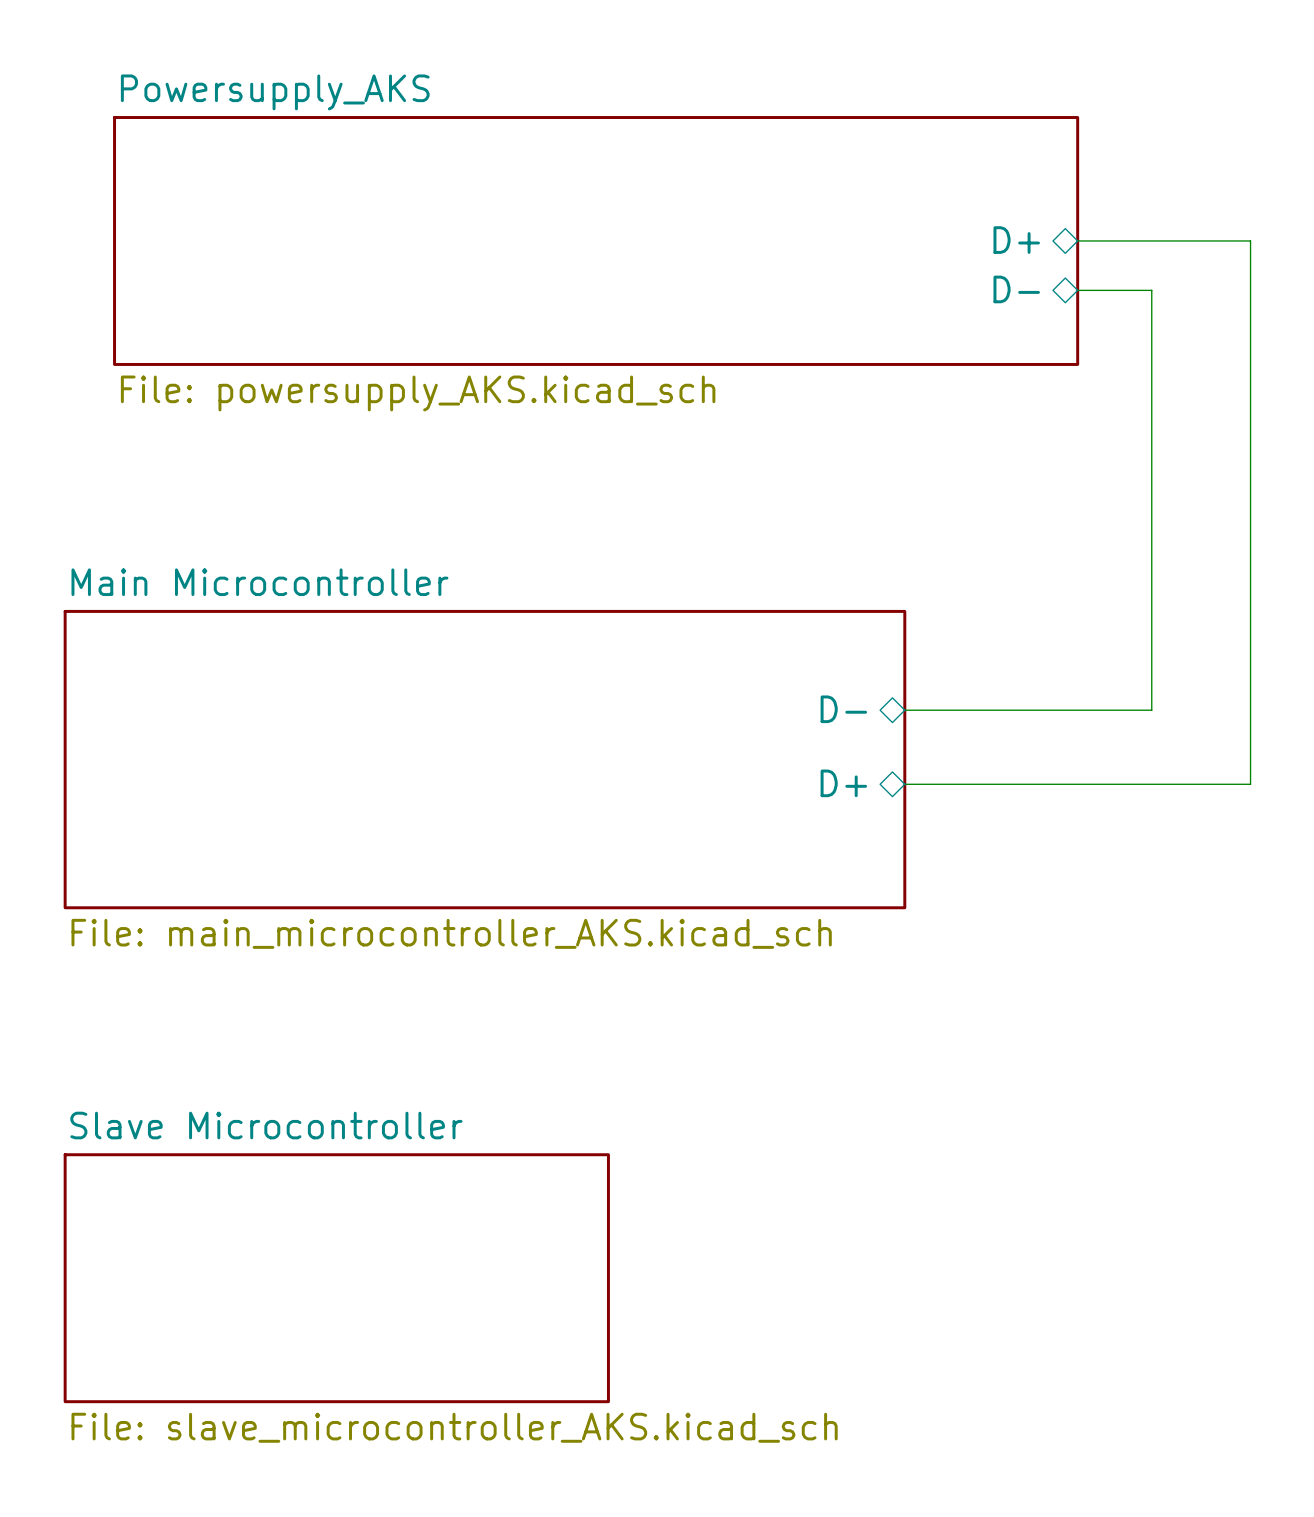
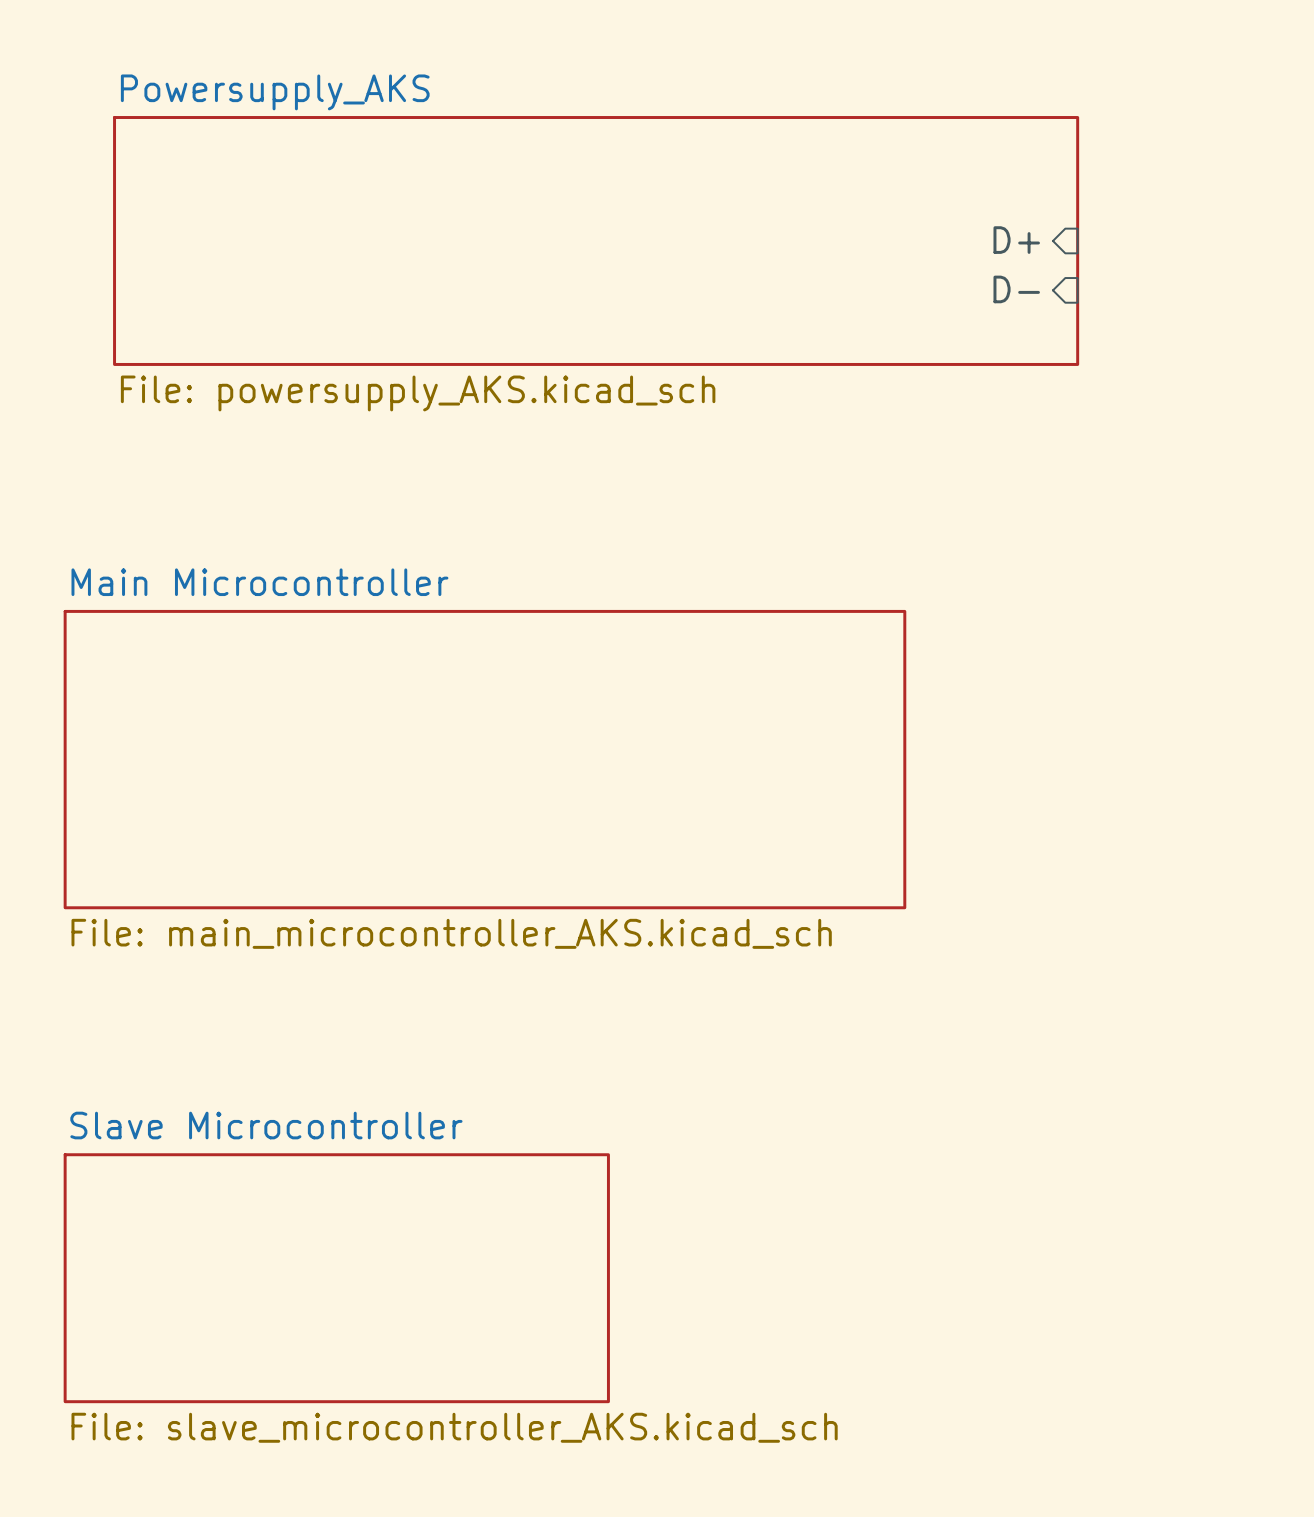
sheet pin shape: bidirectional (1016, 240) -> input (1016, 240)
wire: (1077, 240) (1250, 240) (1250, 784) (904, 784) -> none
sheet pin shape: bidirectional (1016, 289) -> input (1016, 289)
wire: (1077, 290) (1151, 290) (1151, 710) (904, 710) -> none
sheet pin: D- (843, 709) -> none
sheet pin: D+ (843, 783) -> none

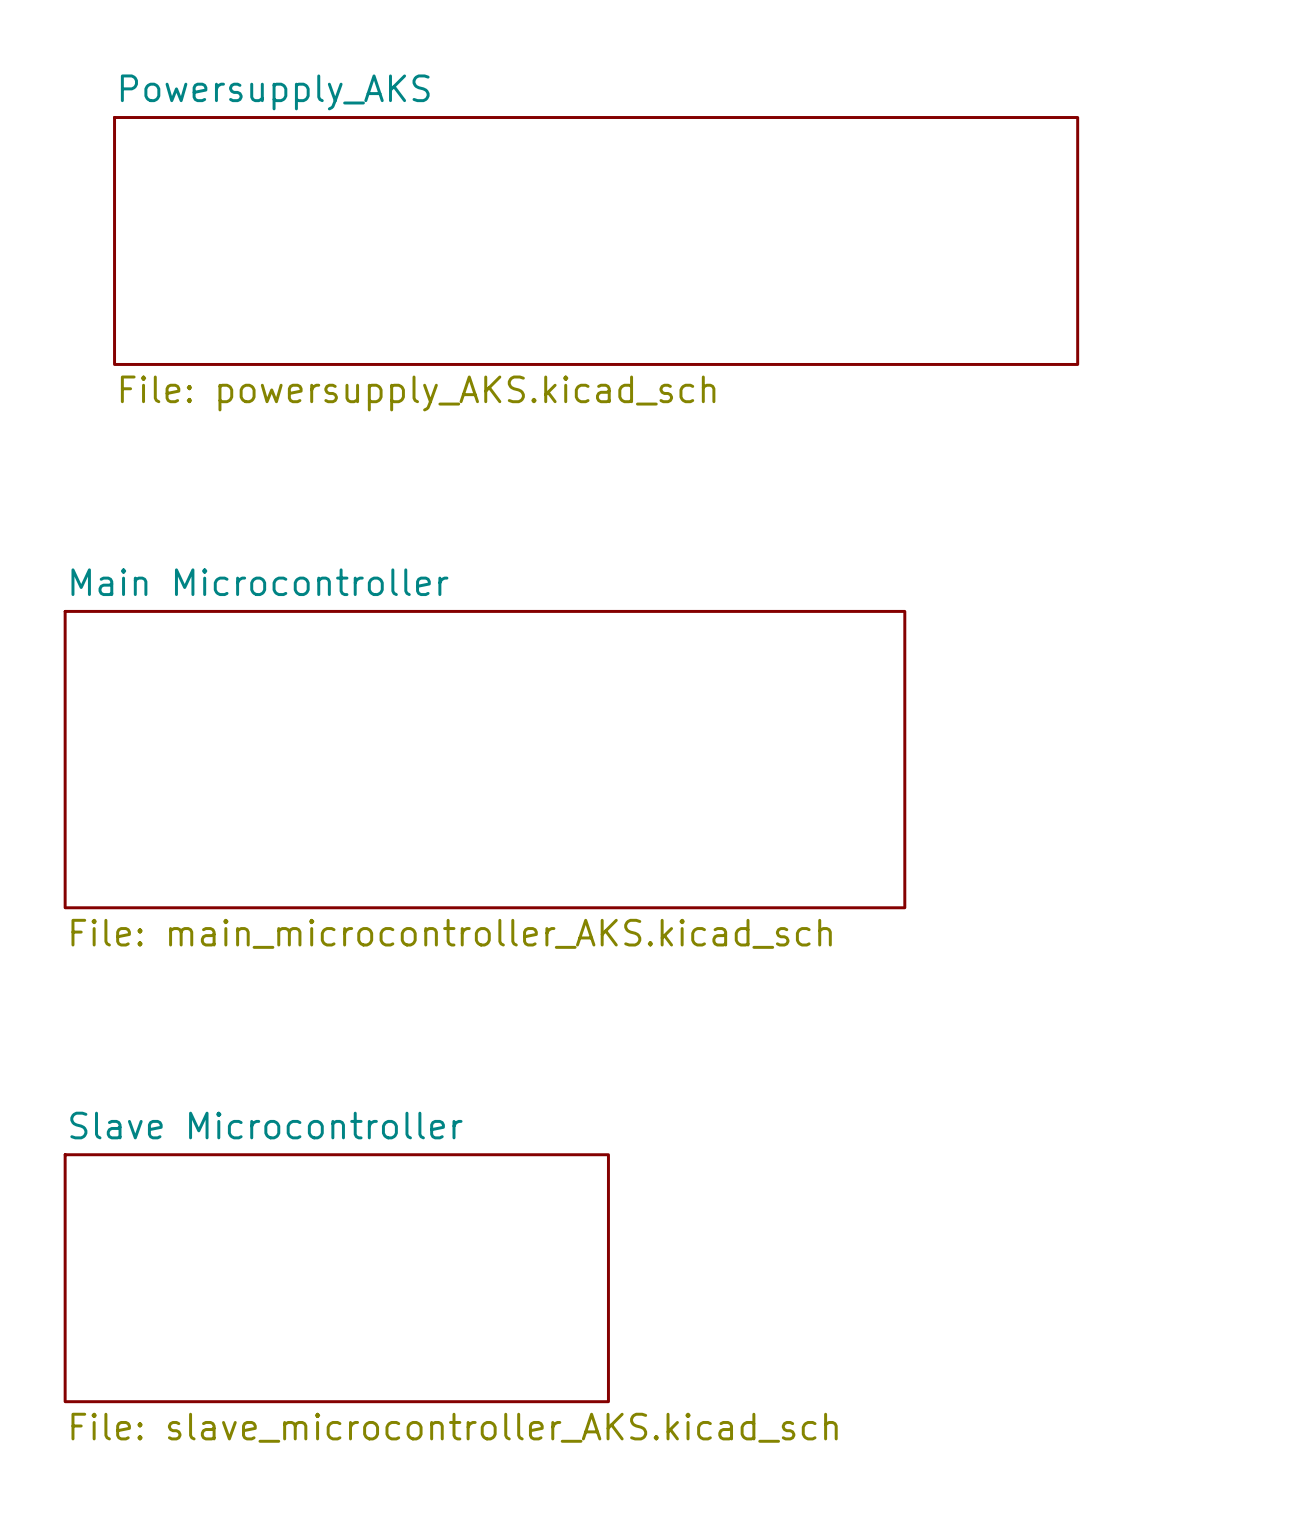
sheet pin: D+ (1016, 240) -> none
sheet pin: D- (1016, 289) -> none

